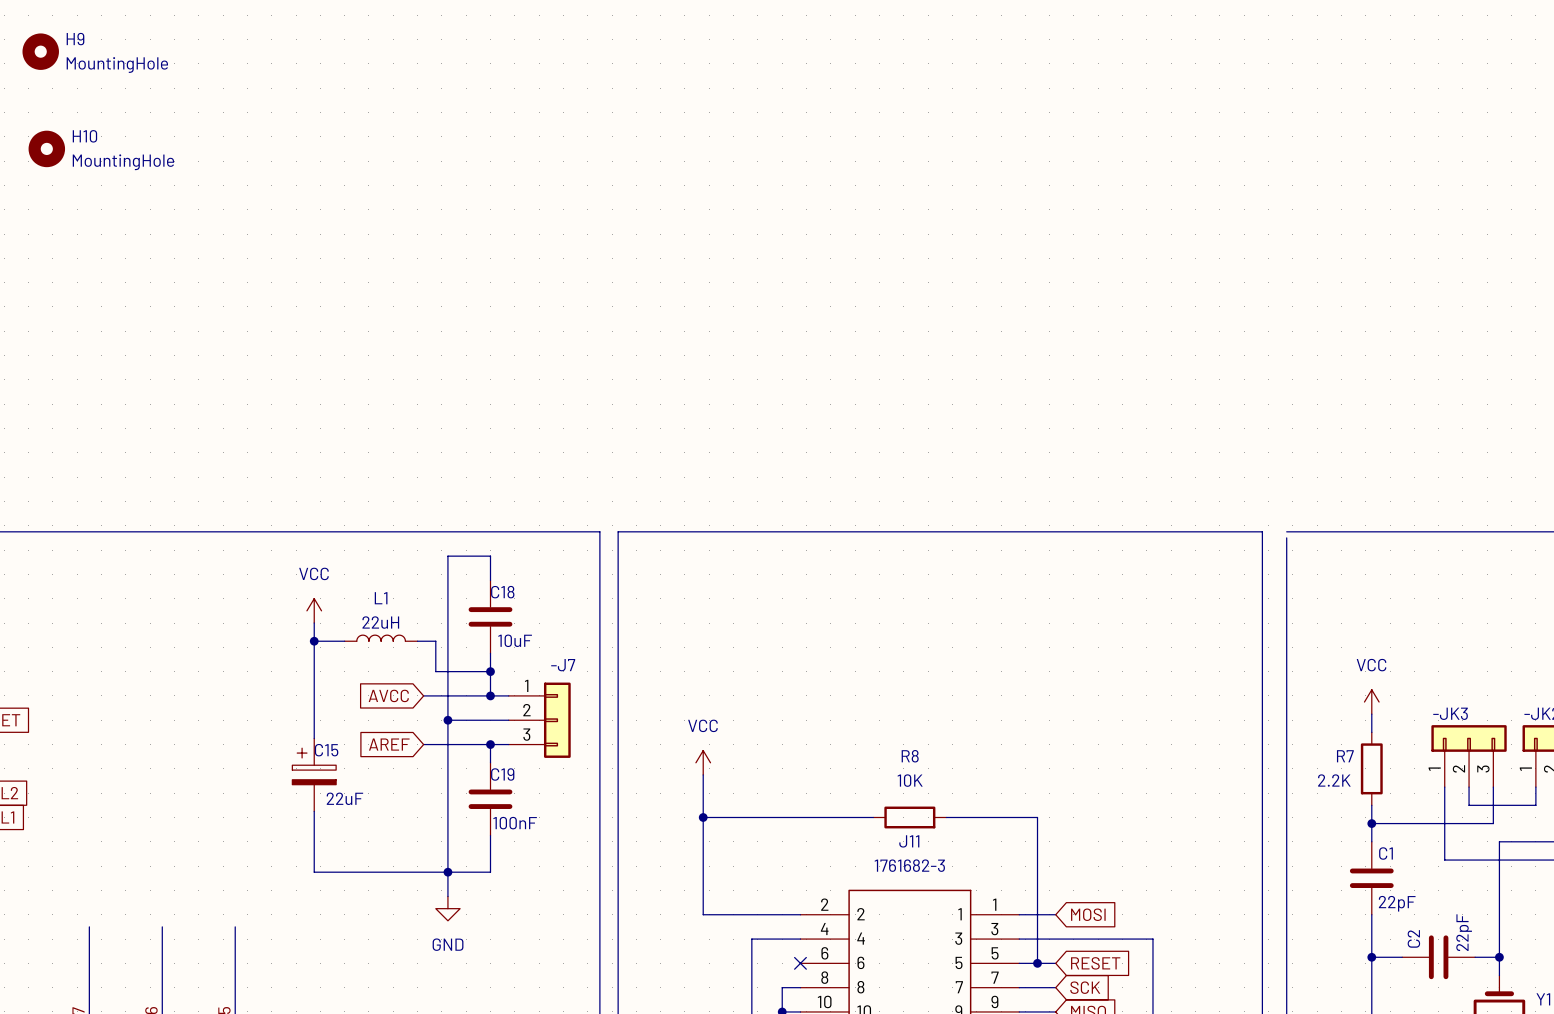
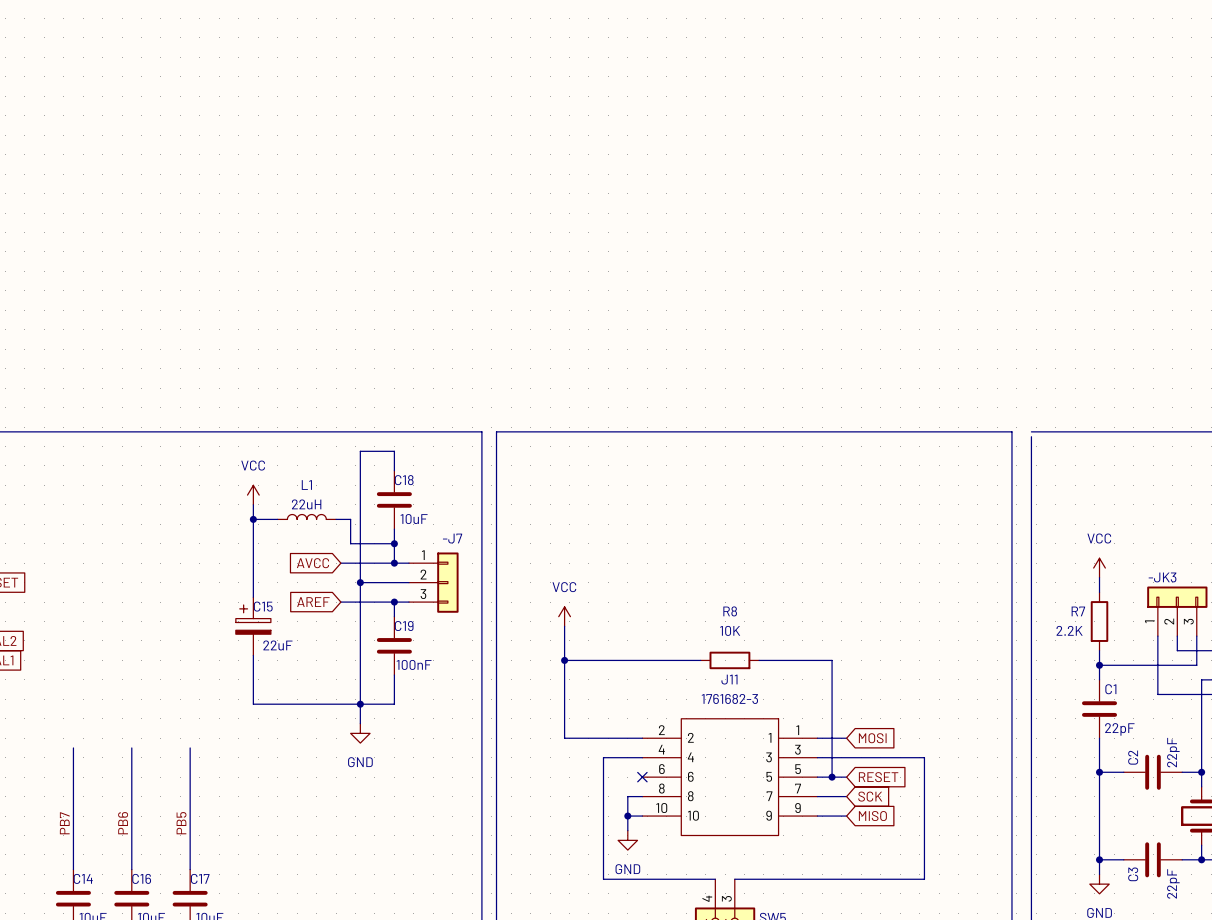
H9: MountingHole (40, 51) -> none
H10: MountingHole (46, 148) -> none

